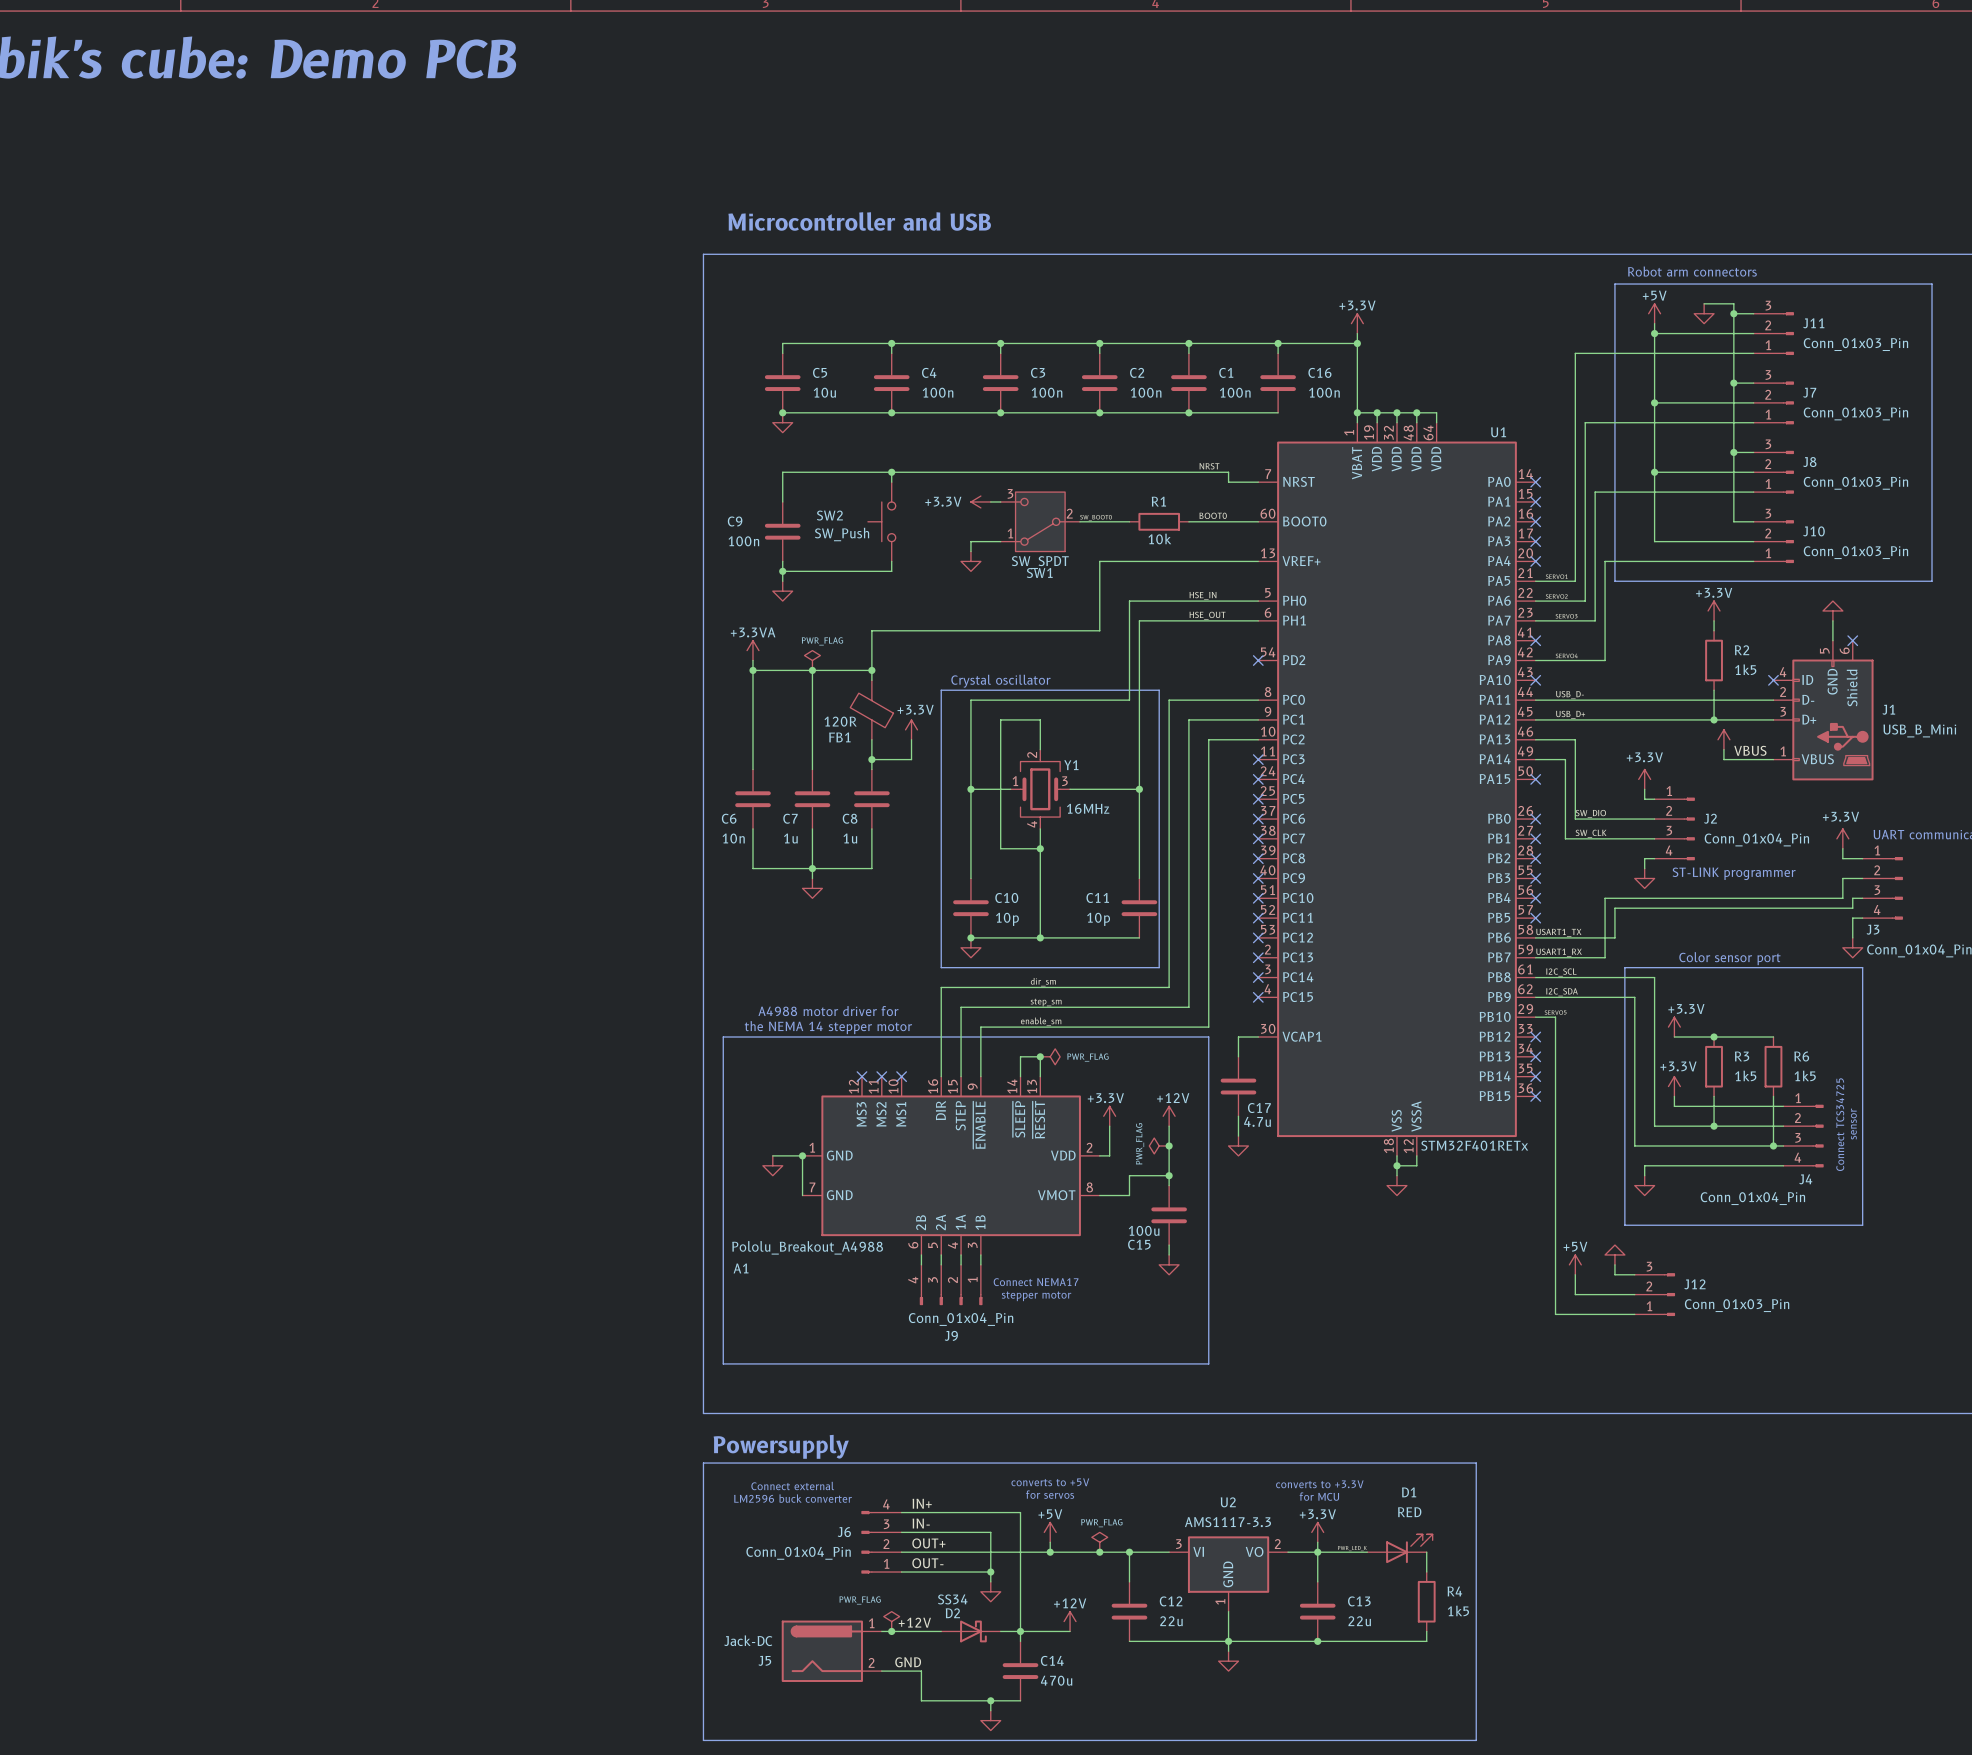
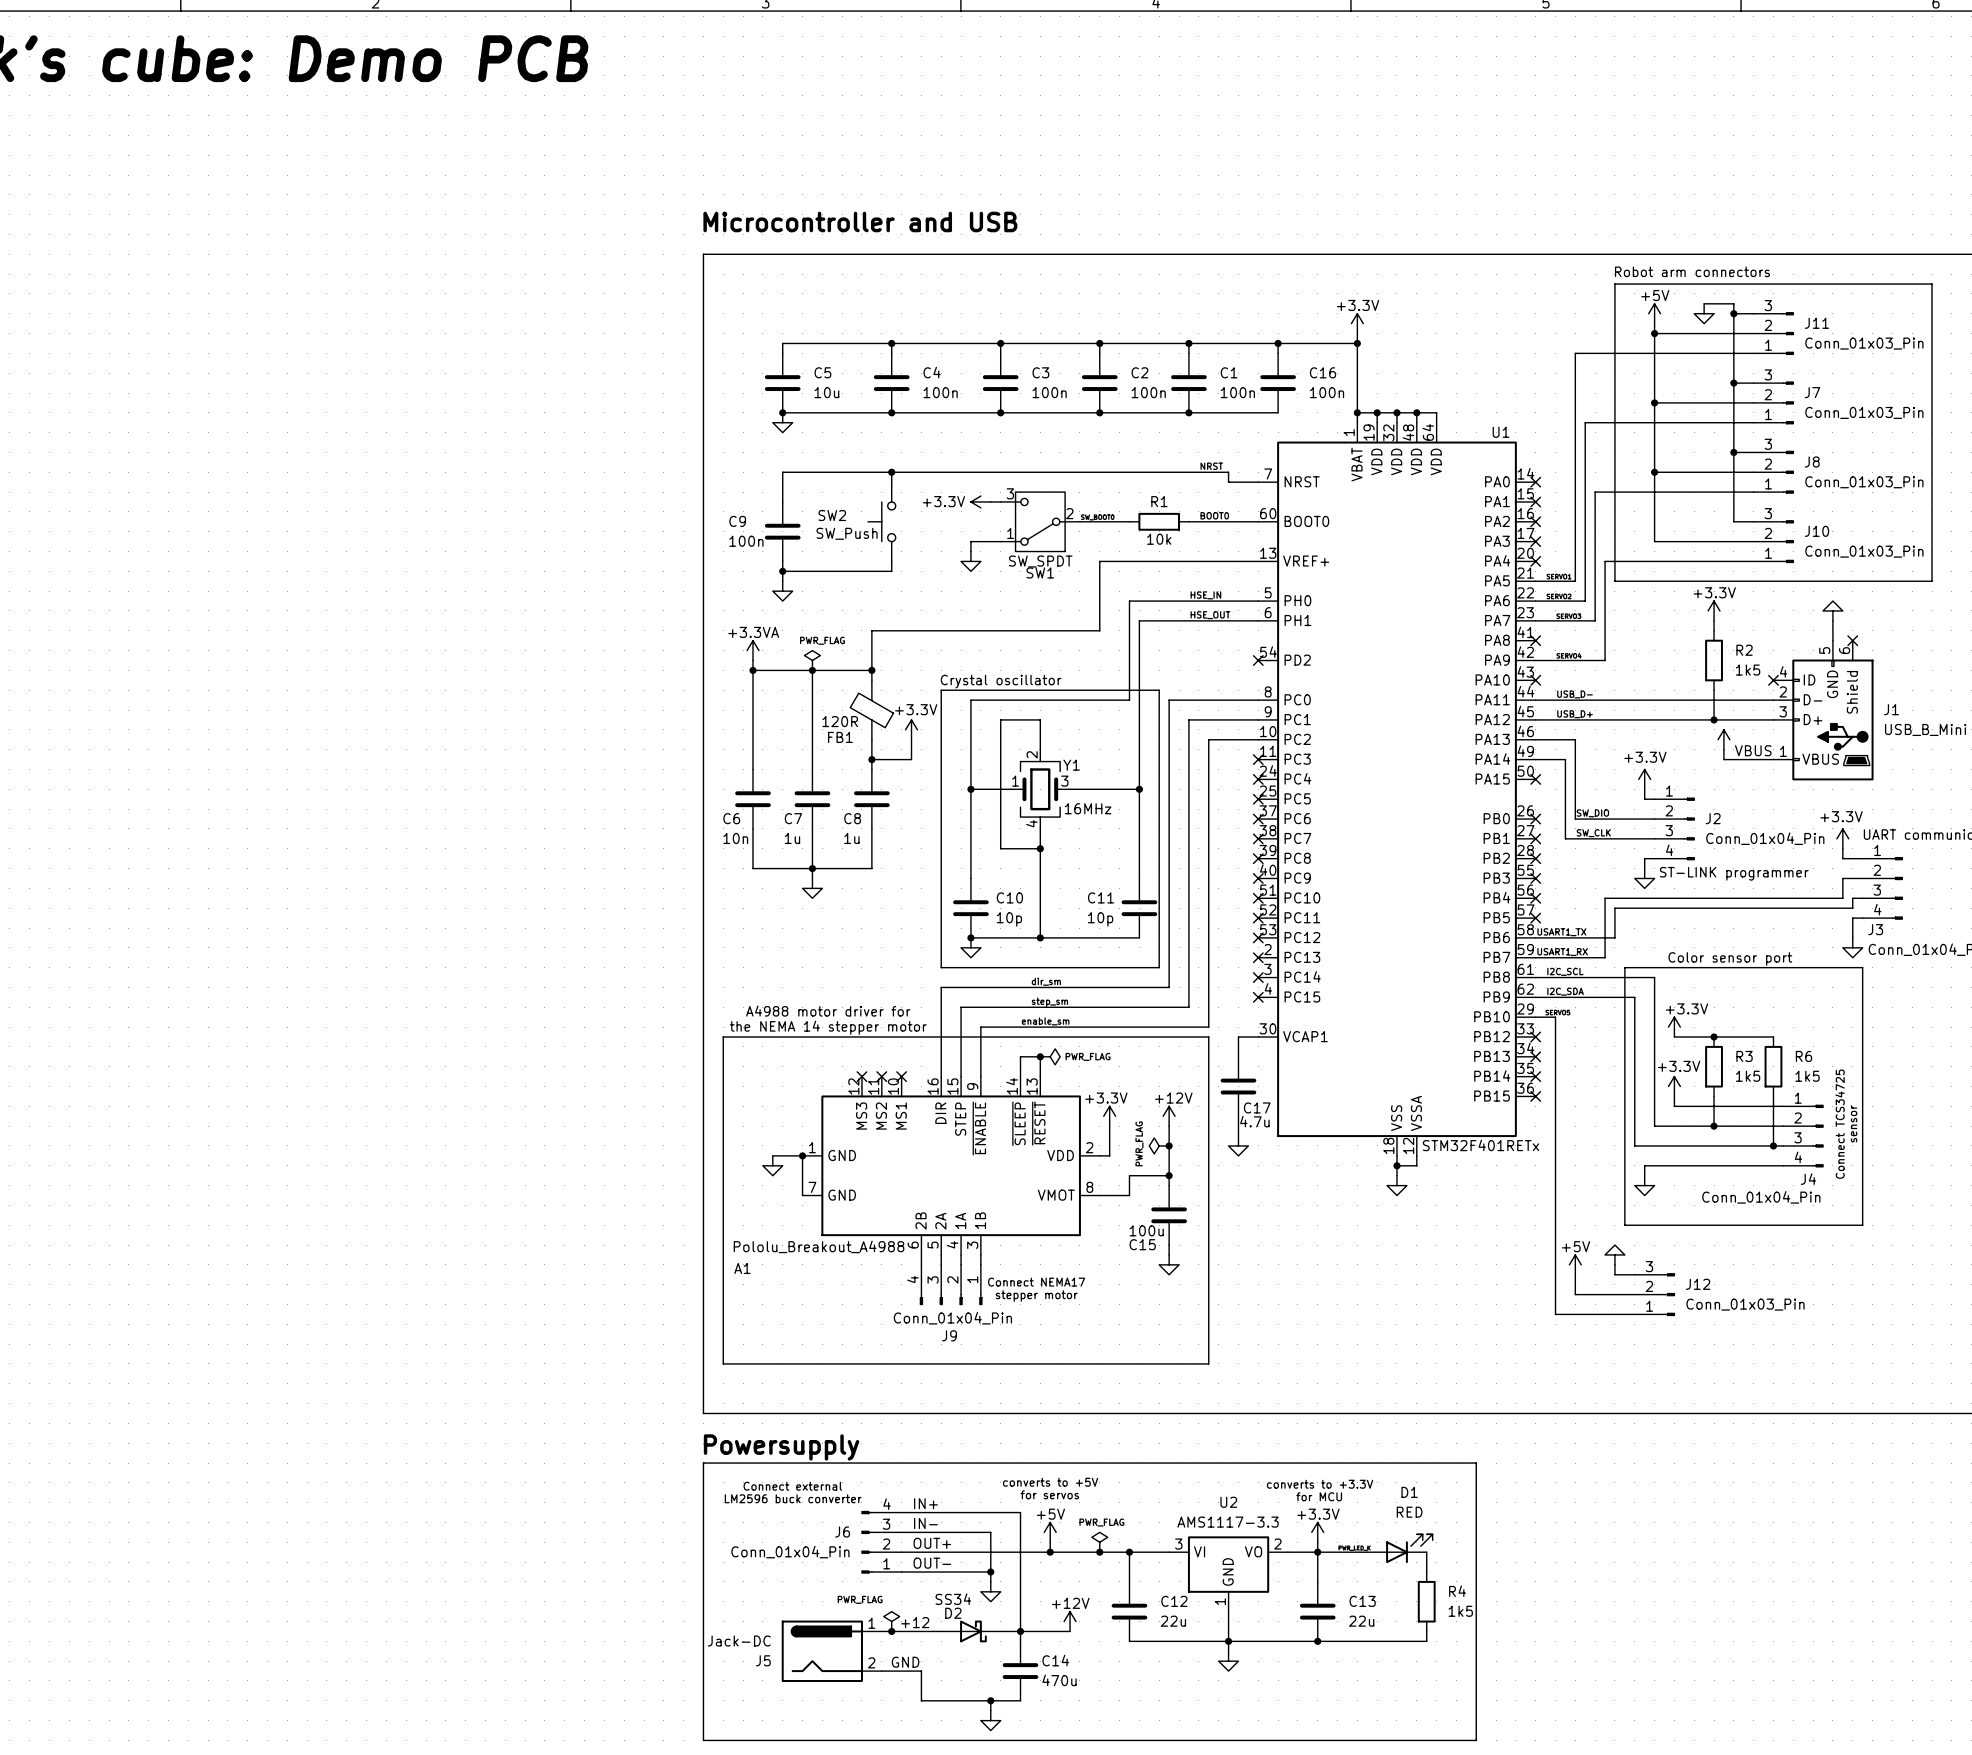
label: +12V (914, 1622) -> +12 (915, 1622)

